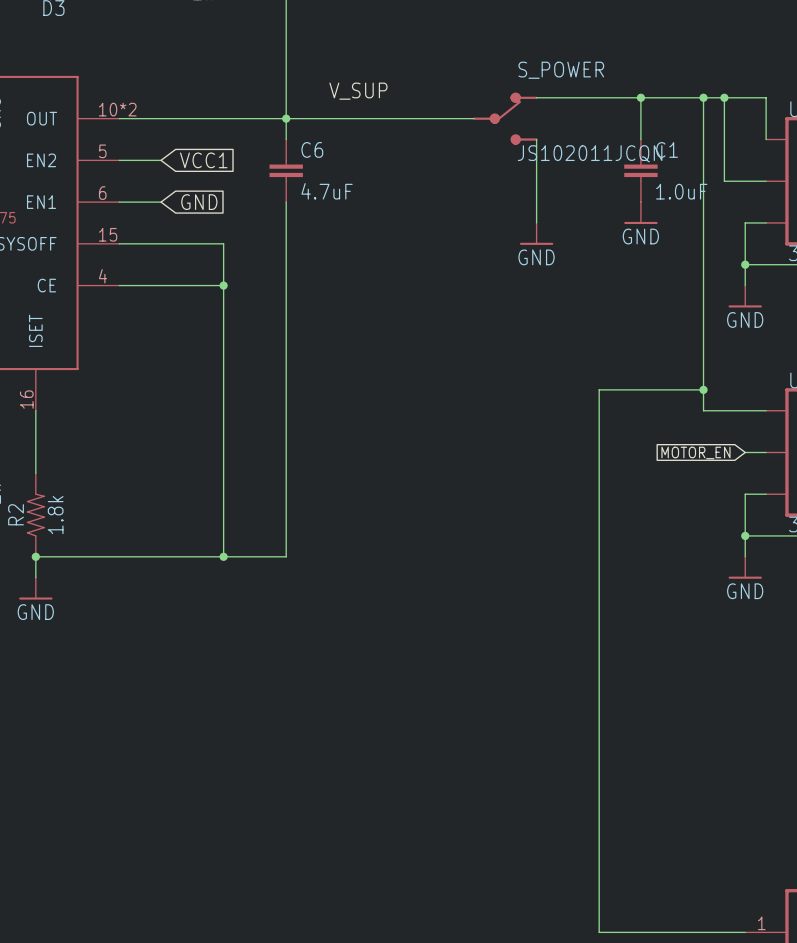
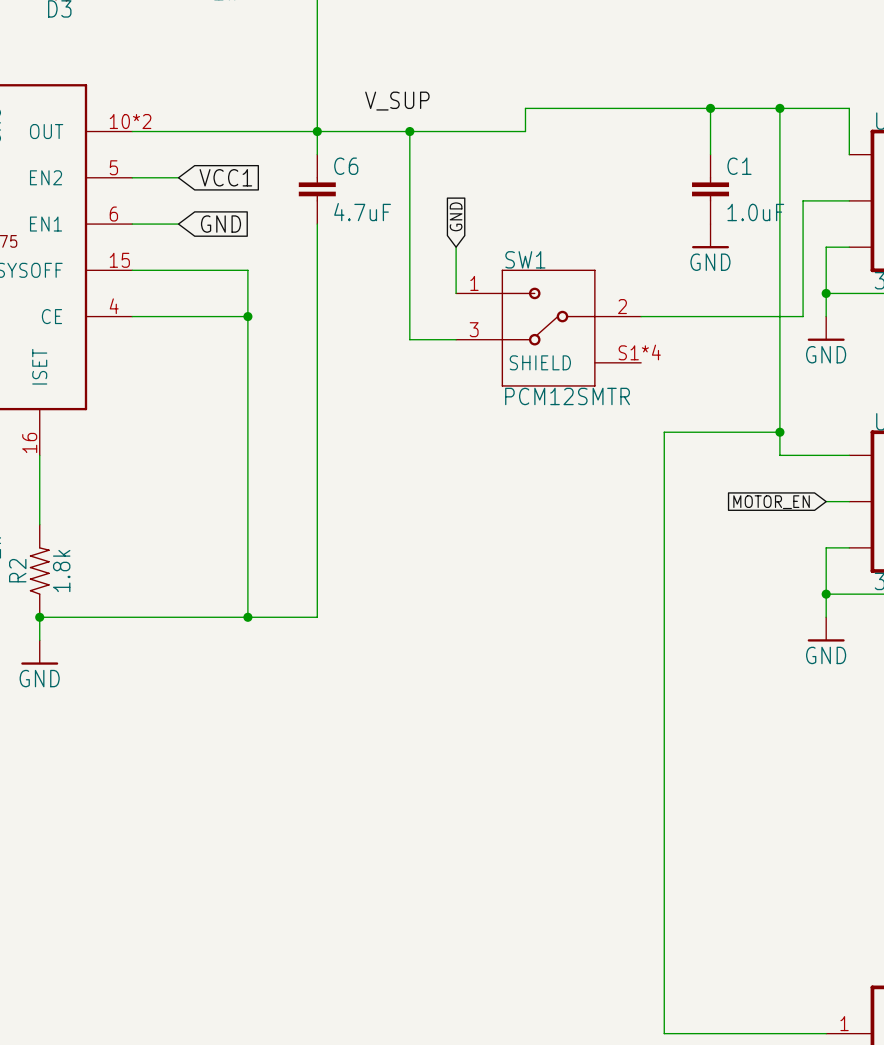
wire: none -> (594, 108) (525, 108) (525, 131)
wire: (724, 97) (724, 181) -> (641, 316) (803, 316) (803, 200)
junction: (724, 97) -> none
wire: none -> (409, 131) (409, 339) (456, 339)
junction: none -> (409, 131)
S_POWER: JS102011JCQN (505, 118) -> none
wire: (536, 139) (536, 222) -> none
global label: none -> GND (456, 216)
wire: none -> (456, 247) (456, 293)
power symbol: GND (536, 233) -> none
SW1: none -> PCM12SMTR (548, 328)

